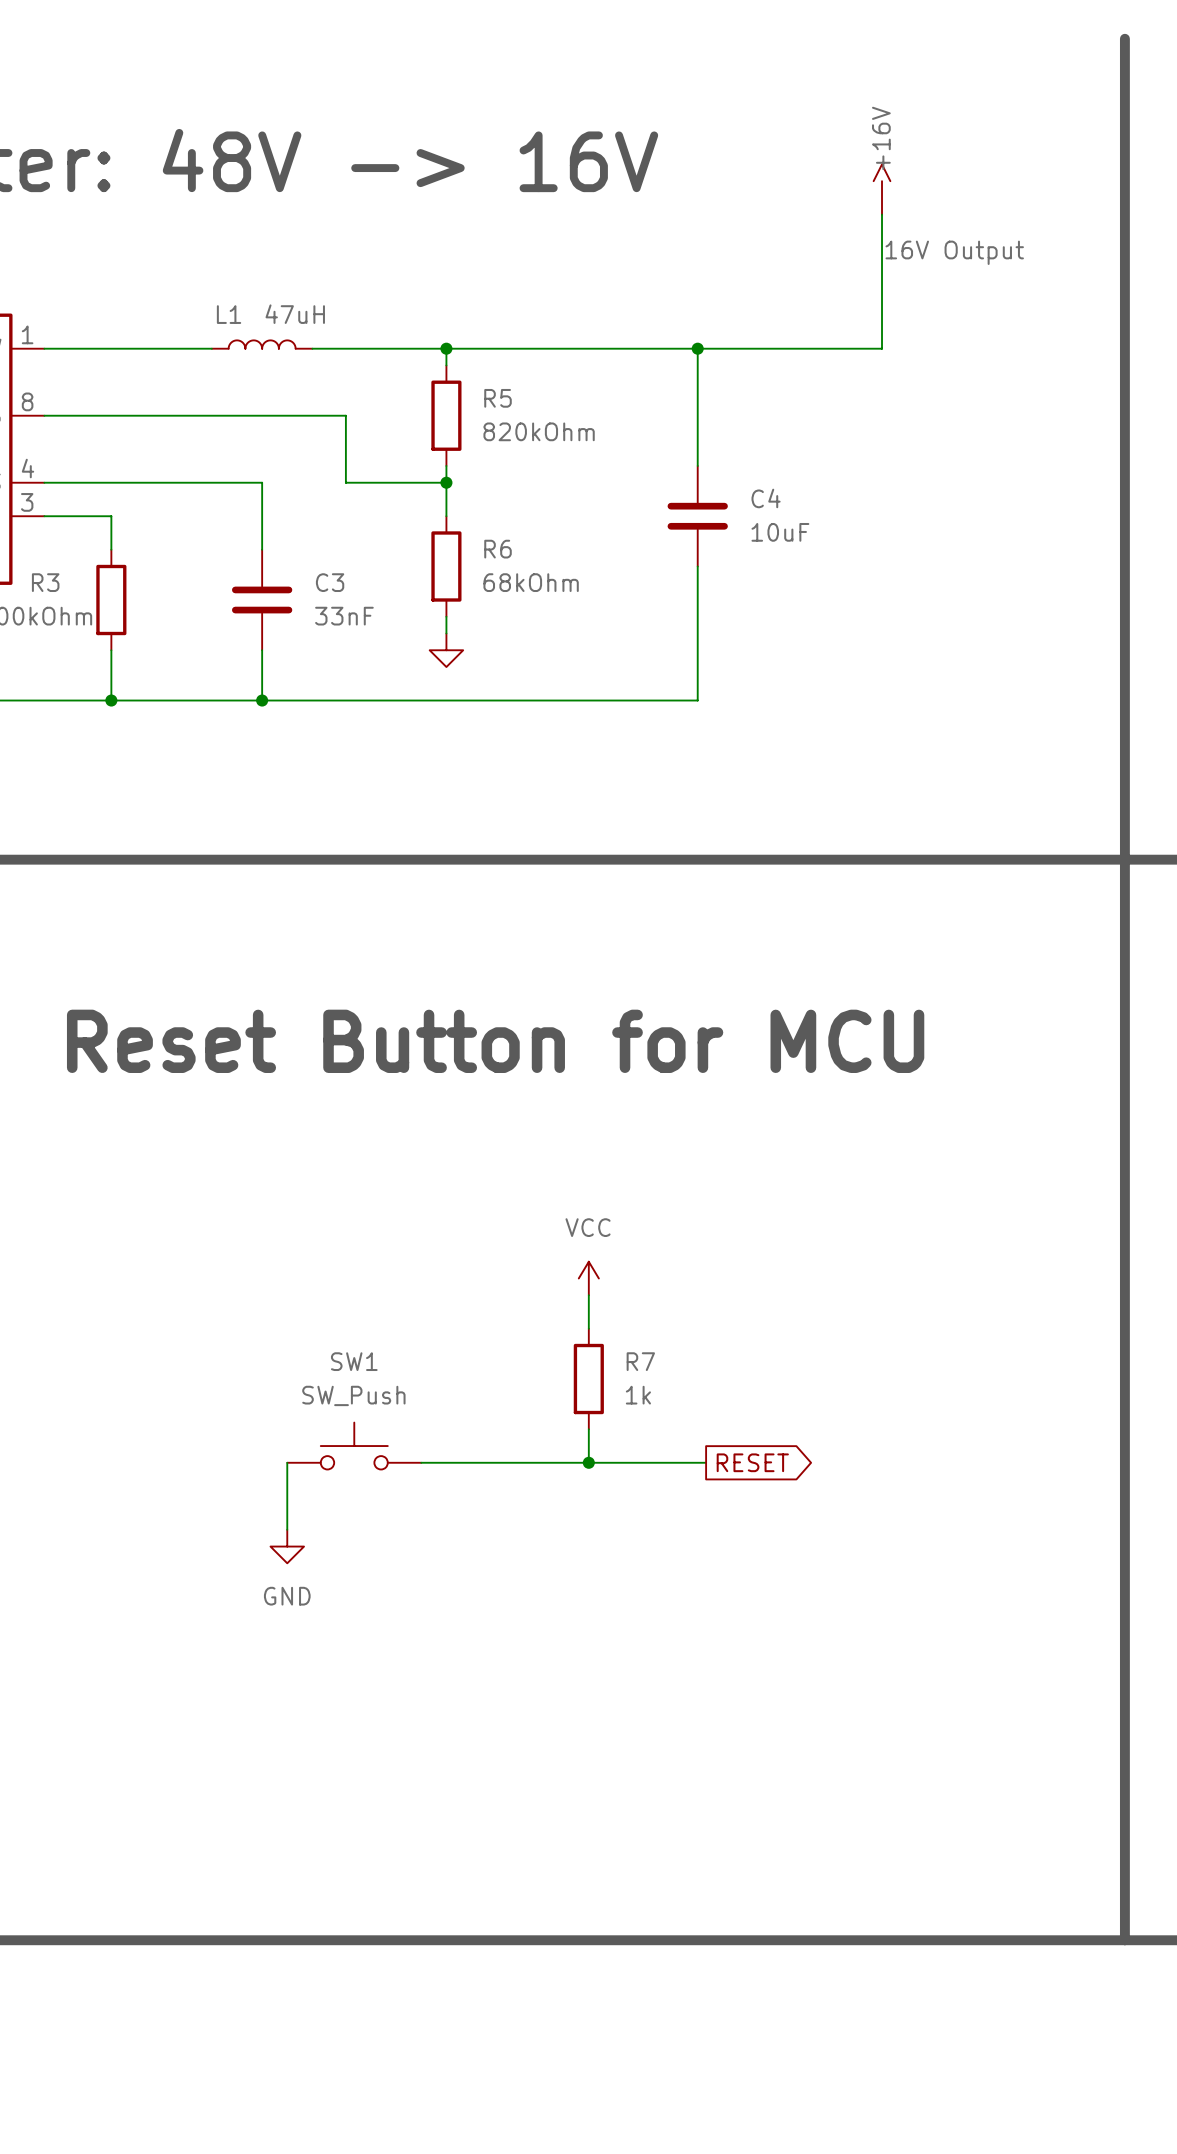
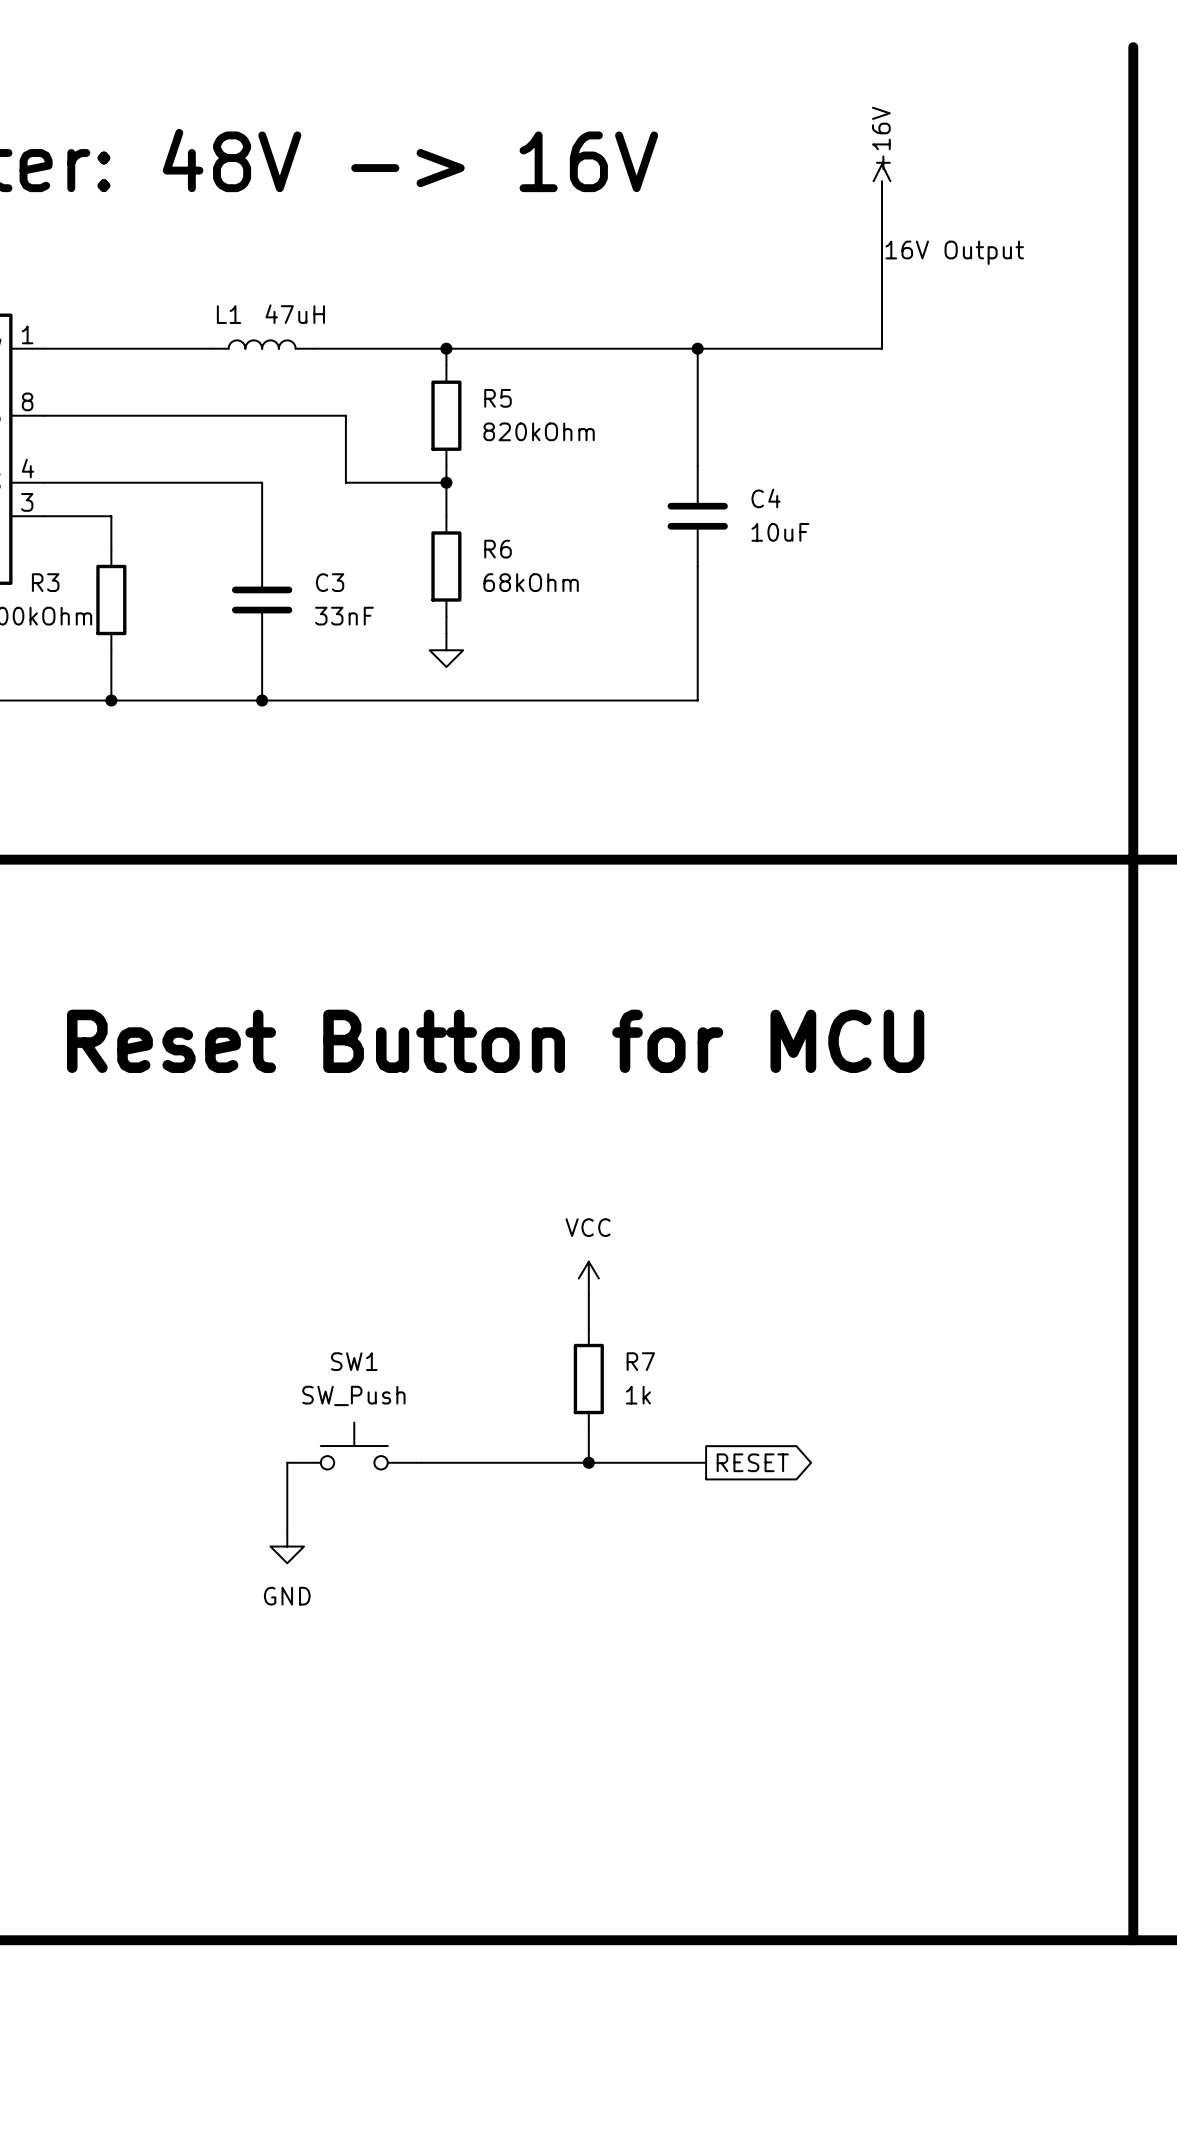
line: (1124, 38) (1124, 1940) -> none
line: none -> (1133, 47) (1133, 1940)

